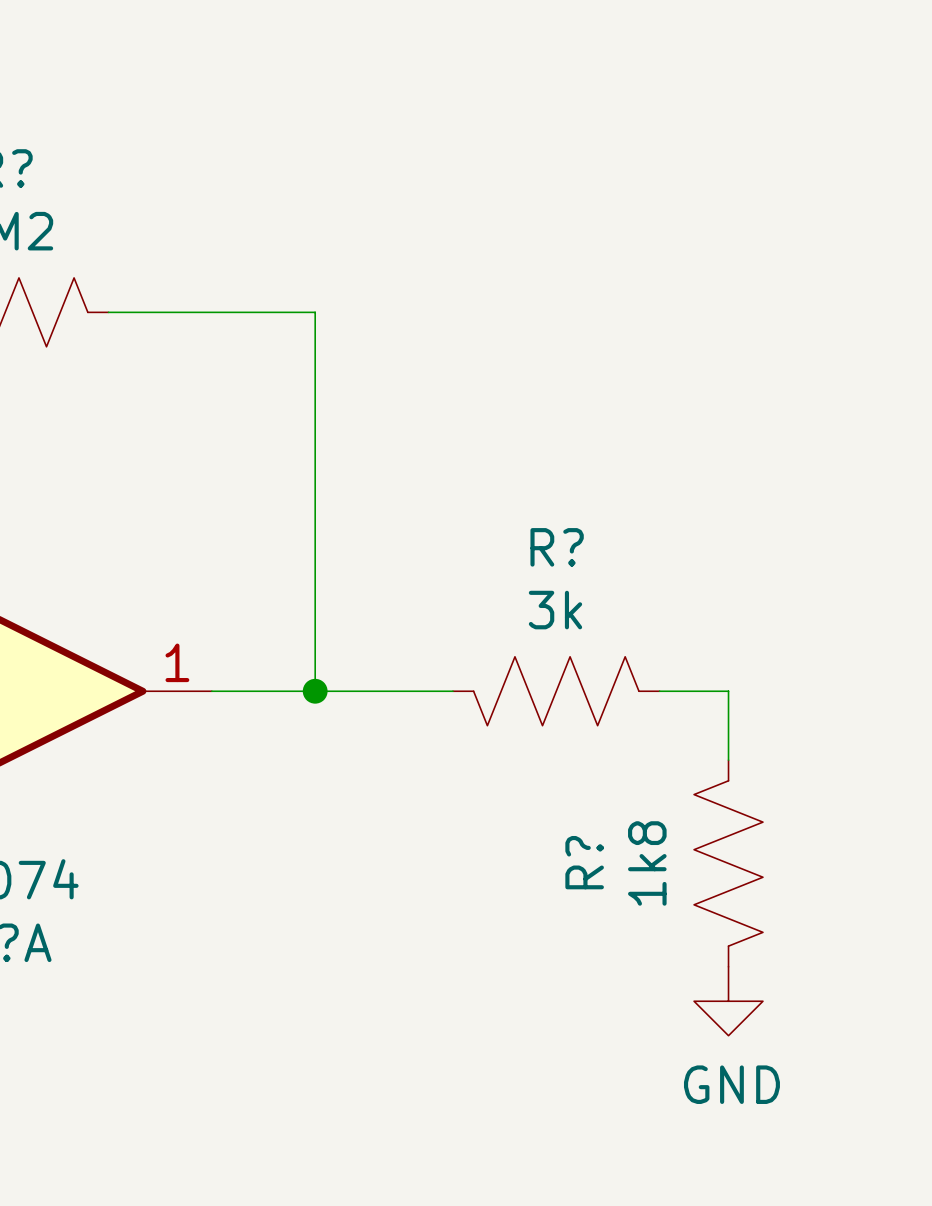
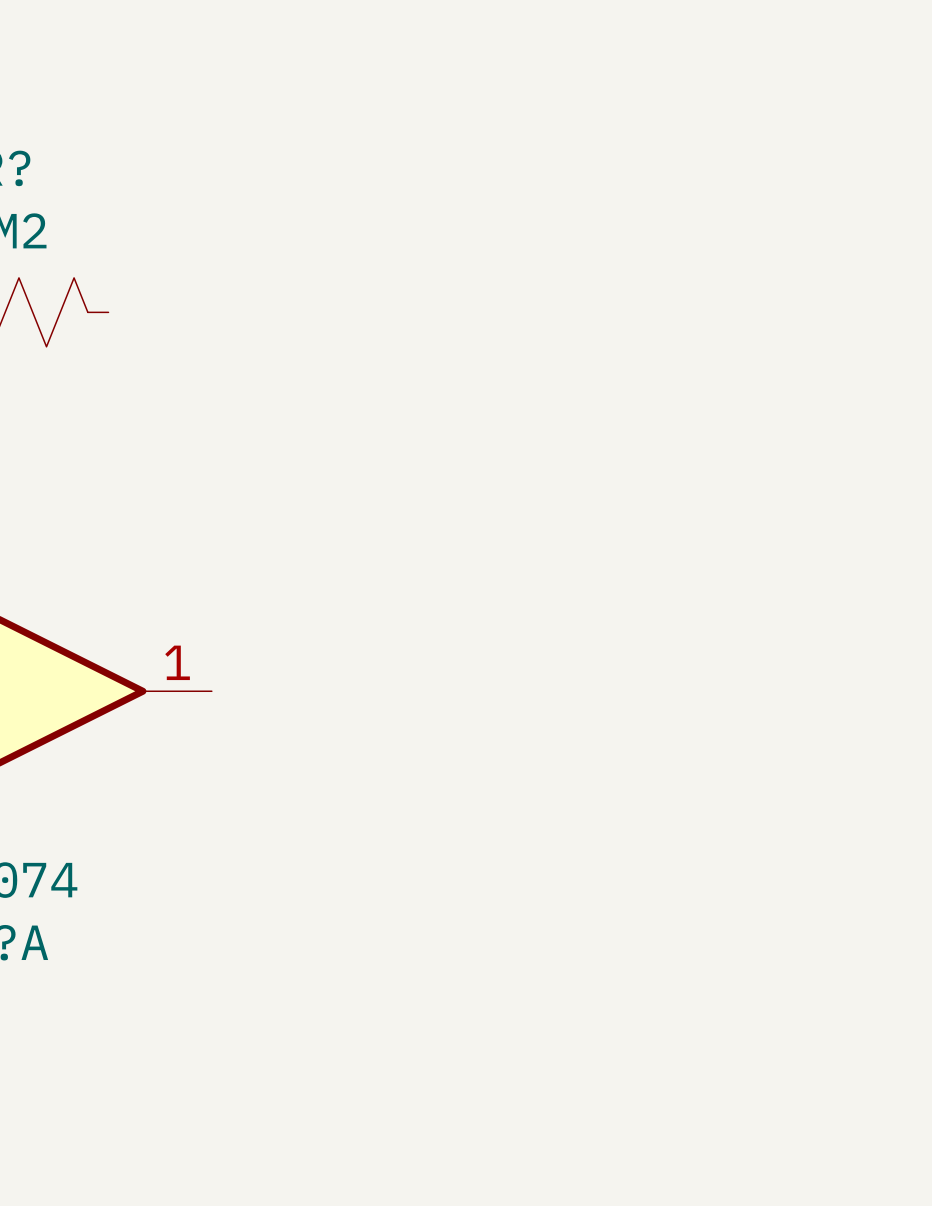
wire: (108, 312) (315, 312) (315, 691) -> none
wire: (211, 691) (452, 691) -> none
junction: (315, 691) -> none
R?: 3k (556, 691) -> none
wire: (659, 691) (728, 691) (728, 760) -> none
R?: 1k8 (728, 863) -> none
power symbol: GND (728, 1001) -> none

